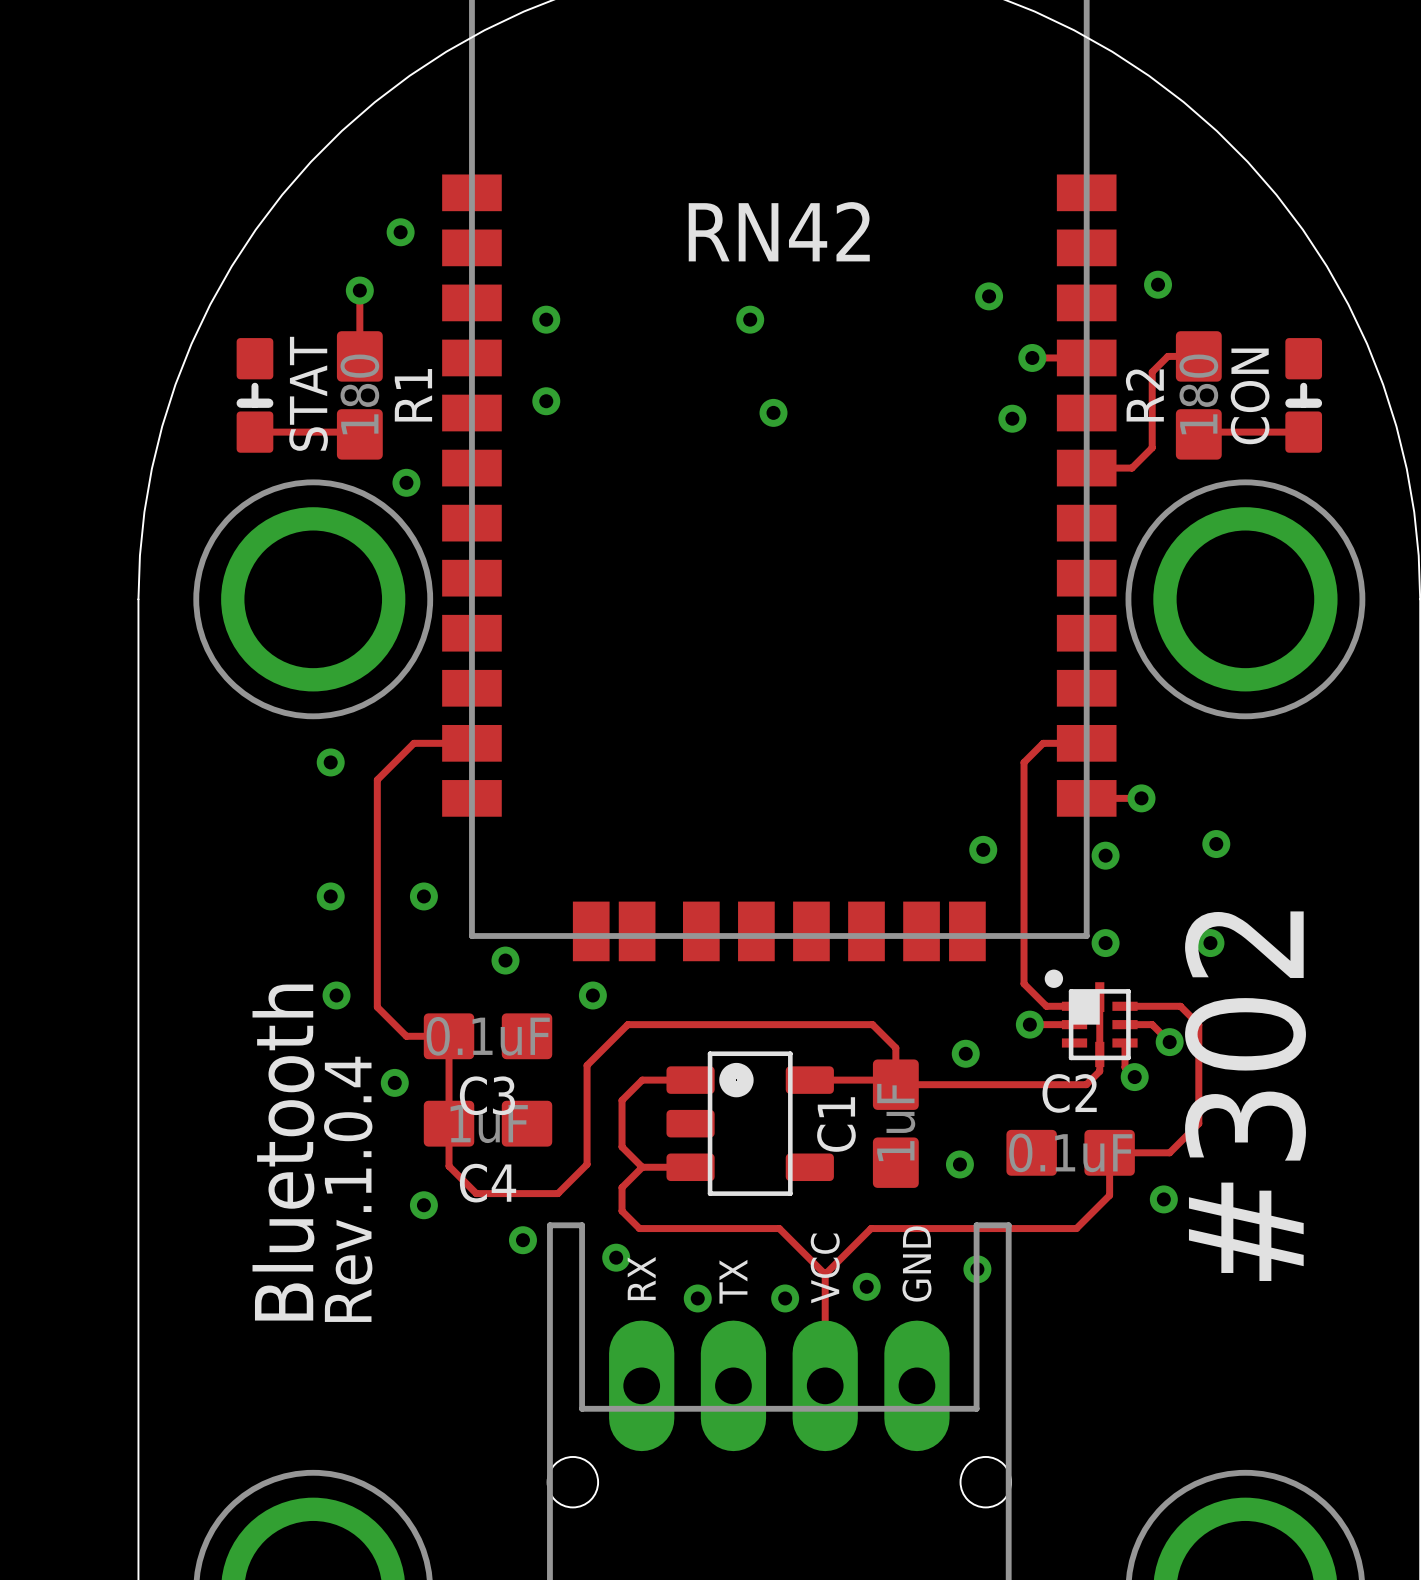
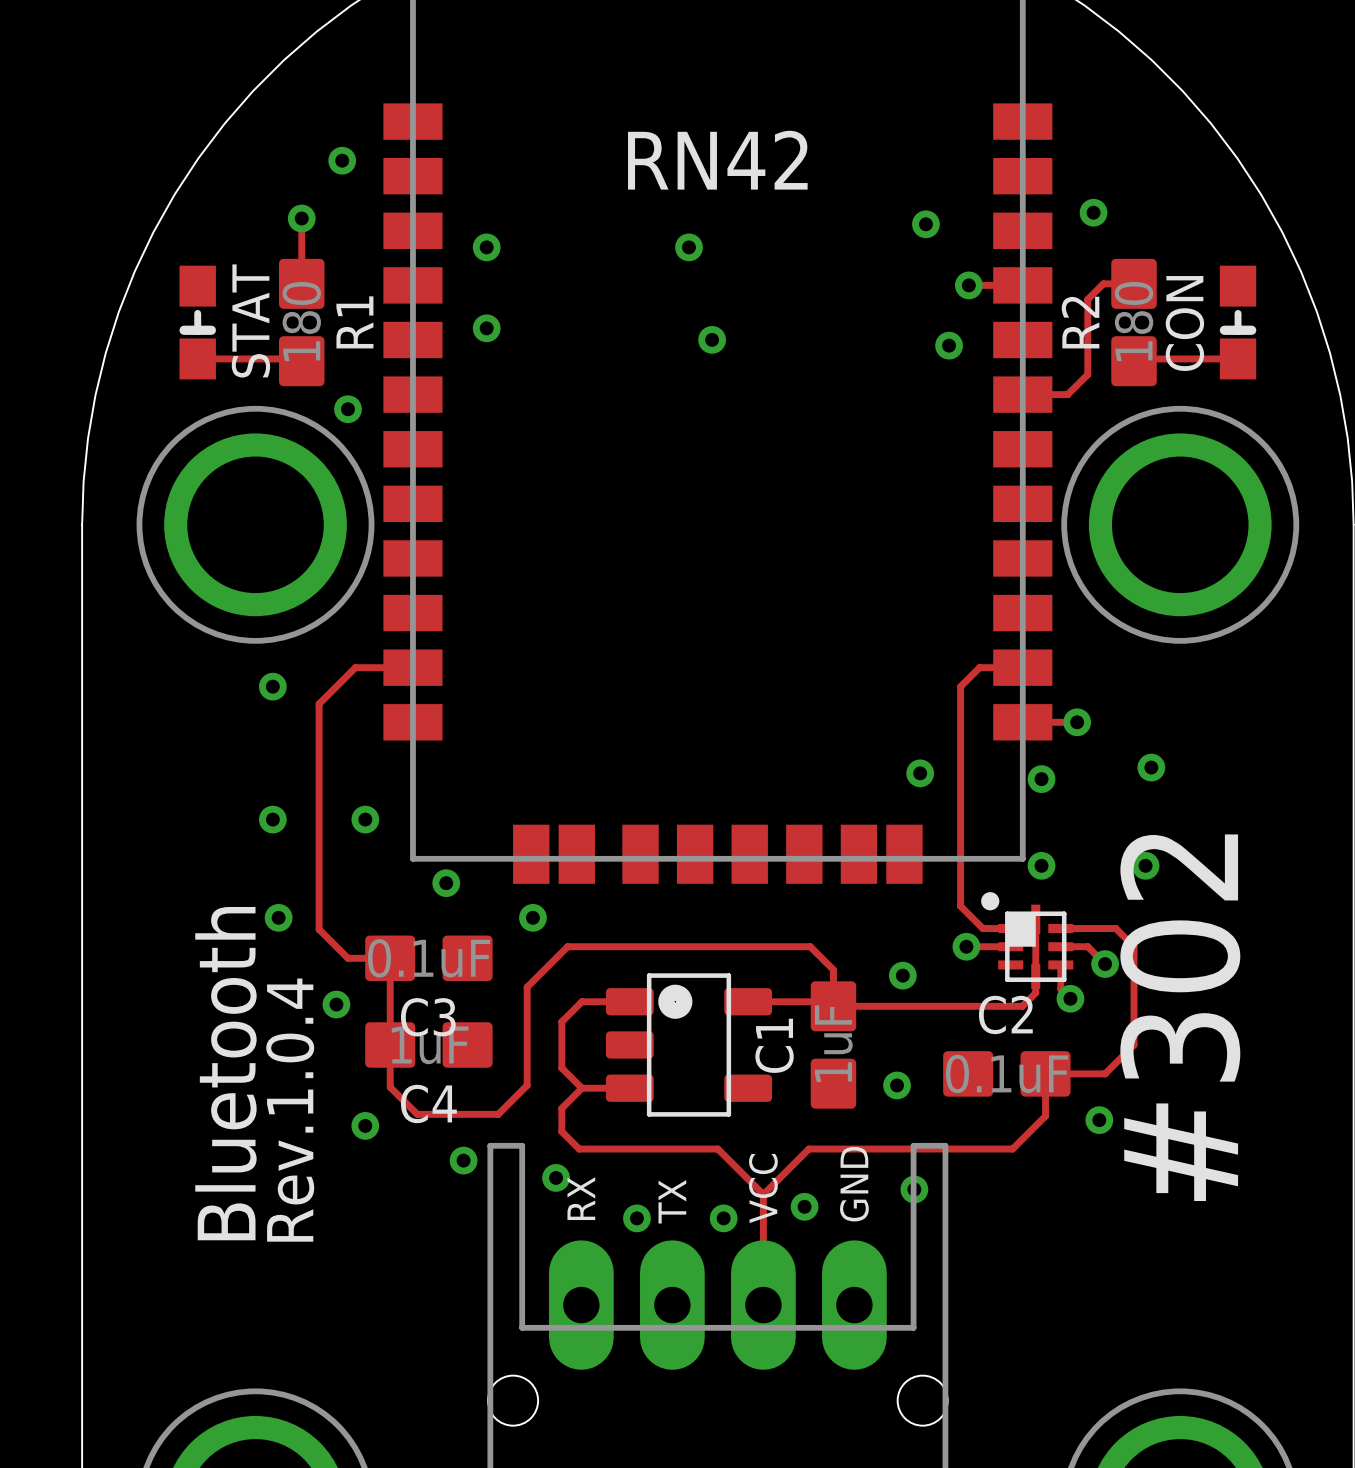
part footprint: [236, 338, 274, 453] -> [179, 265, 216, 380]
part footprint: [1285, 338, 1323, 453] -> [1219, 265, 1257, 380]

